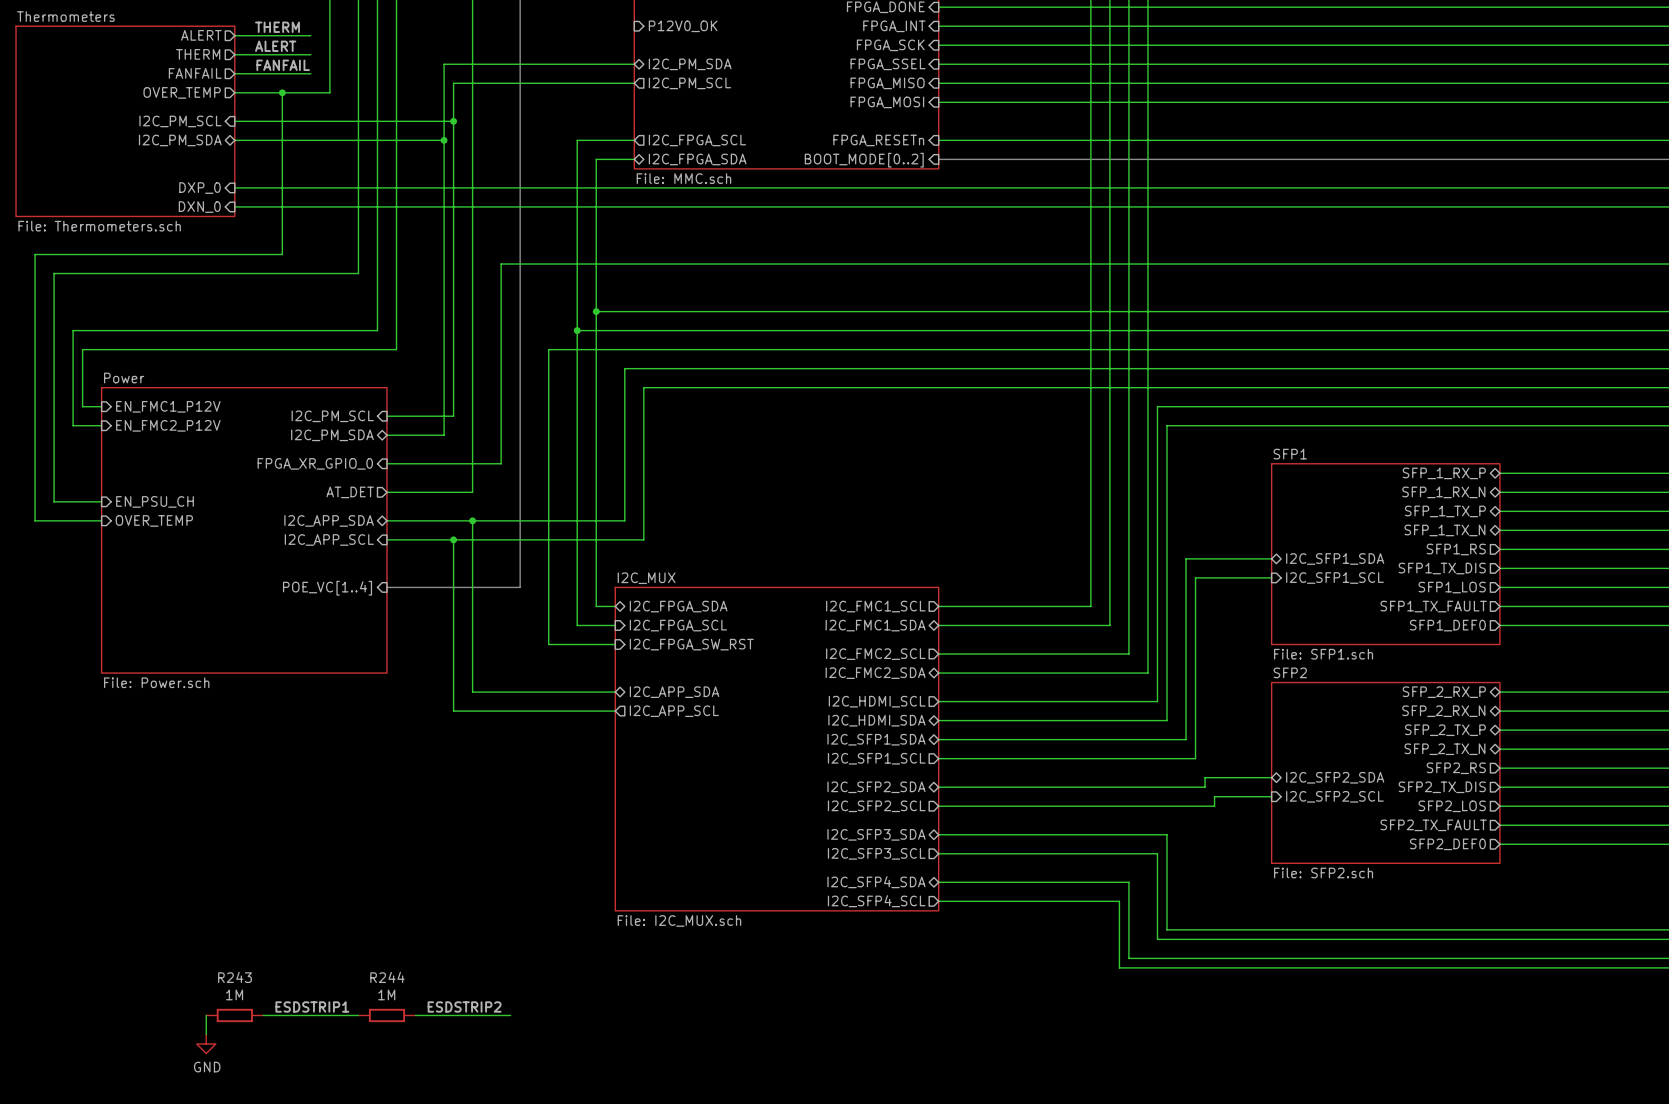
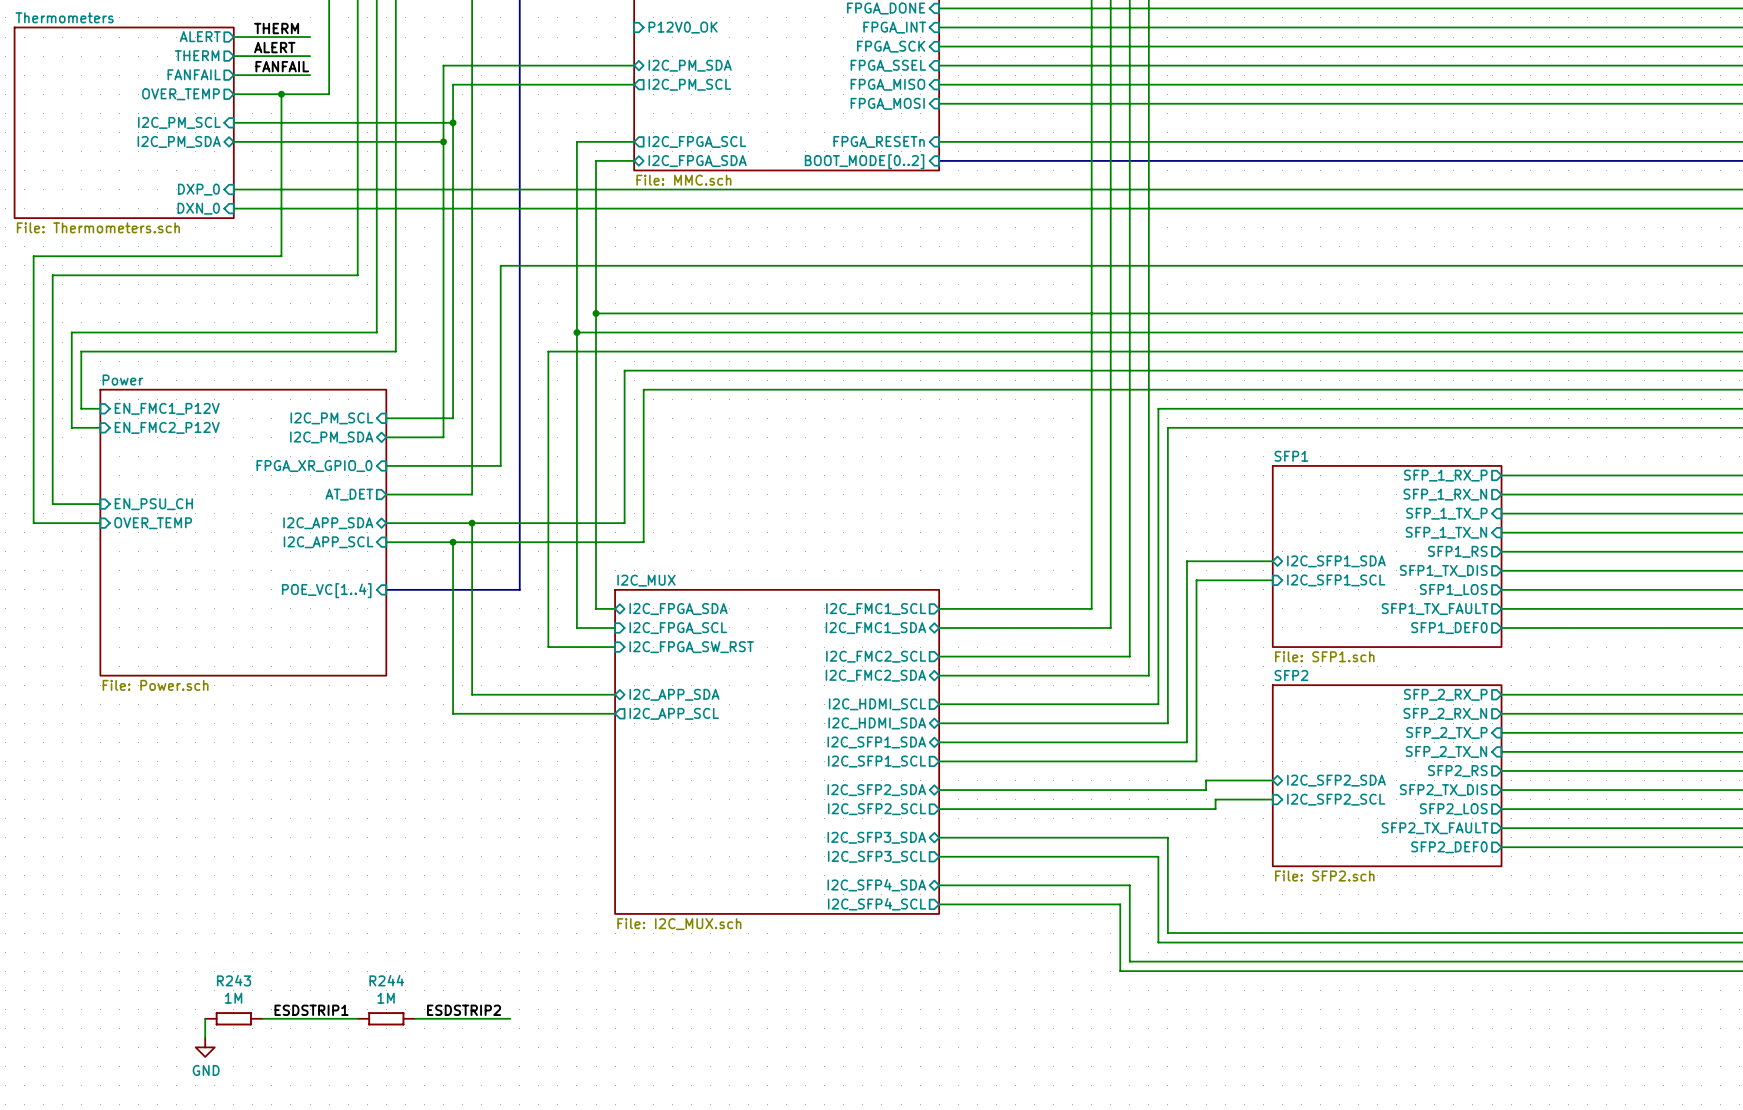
sheet pin shape: bidirectional (1444, 473) -> output (1445, 475)
sheet pin shape: bidirectional (1443, 492) -> output (1445, 494)
sheet pin shape: bidirectional (1445, 511) -> input (1446, 513)
sheet pin shape: bidirectional (1444, 530) -> input (1446, 532)
sheet pin shape: bidirectional (1444, 692) -> output (1445, 694)
sheet pin shape: bidirectional (1443, 711) -> output (1445, 713)
sheet pin shape: bidirectional (1445, 730) -> input (1446, 732)
sheet pin shape: bidirectional (1444, 749) -> input (1446, 752)

